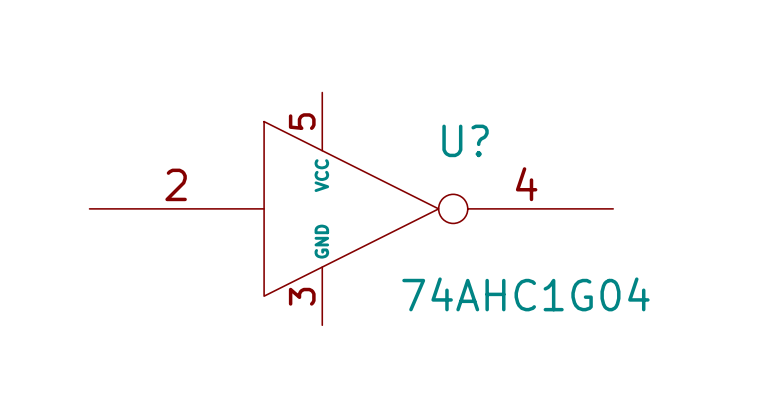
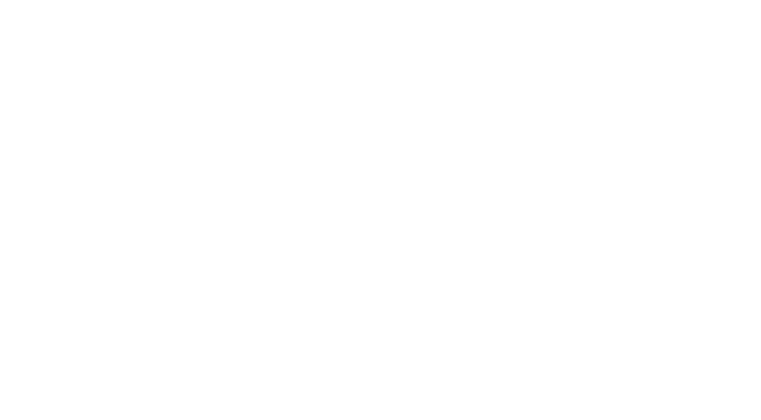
U?: 74AHC1G04 (351, 208) -> none

